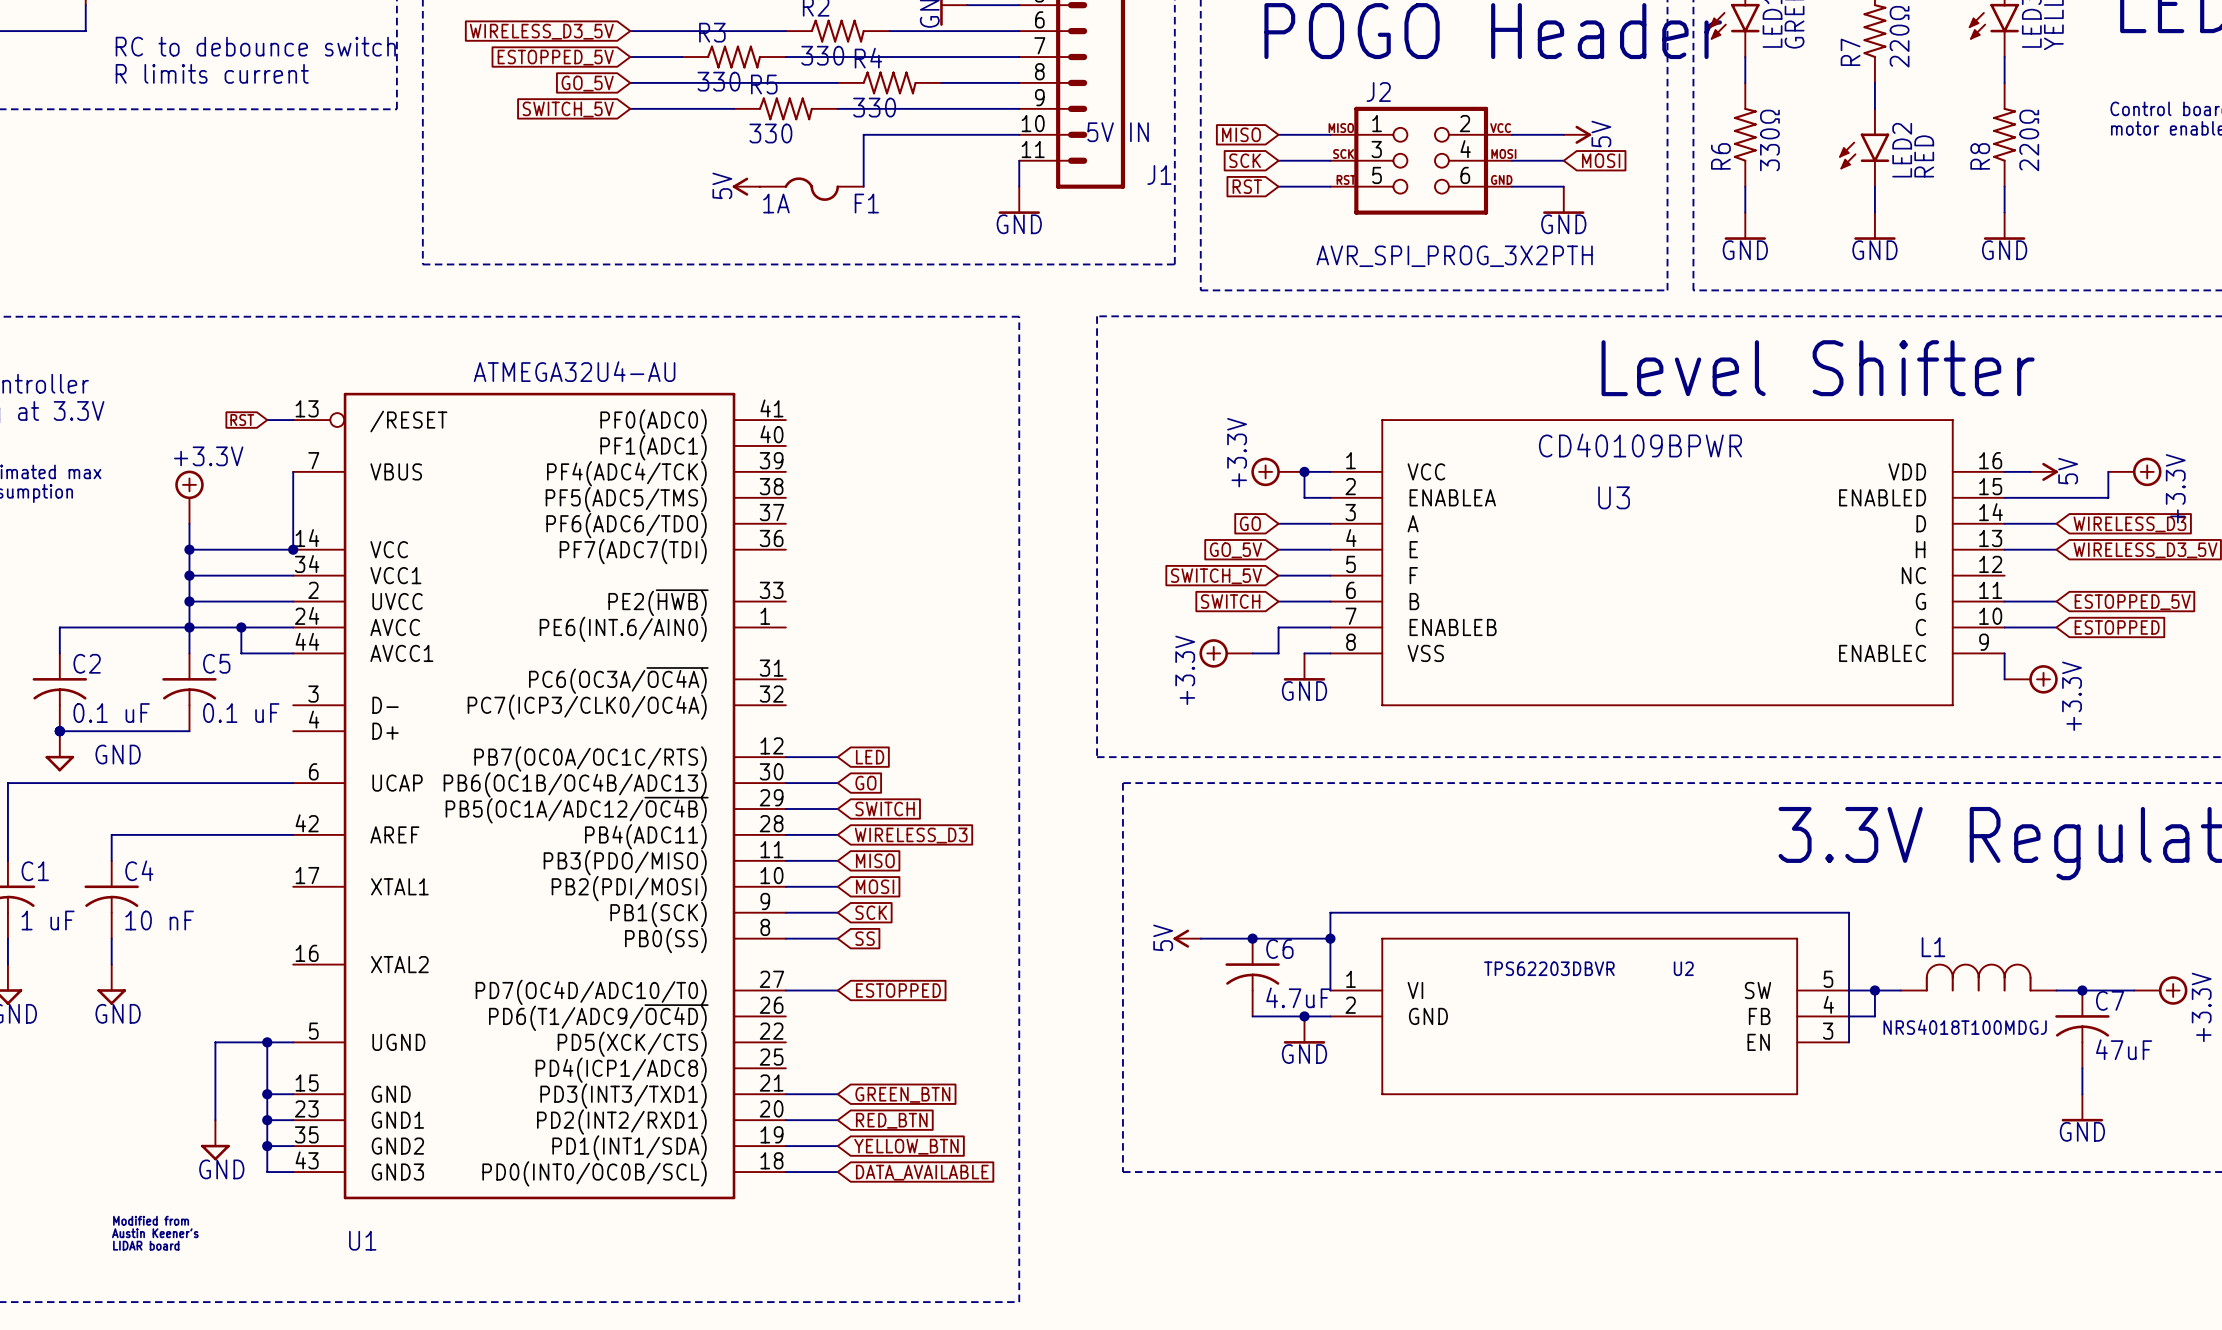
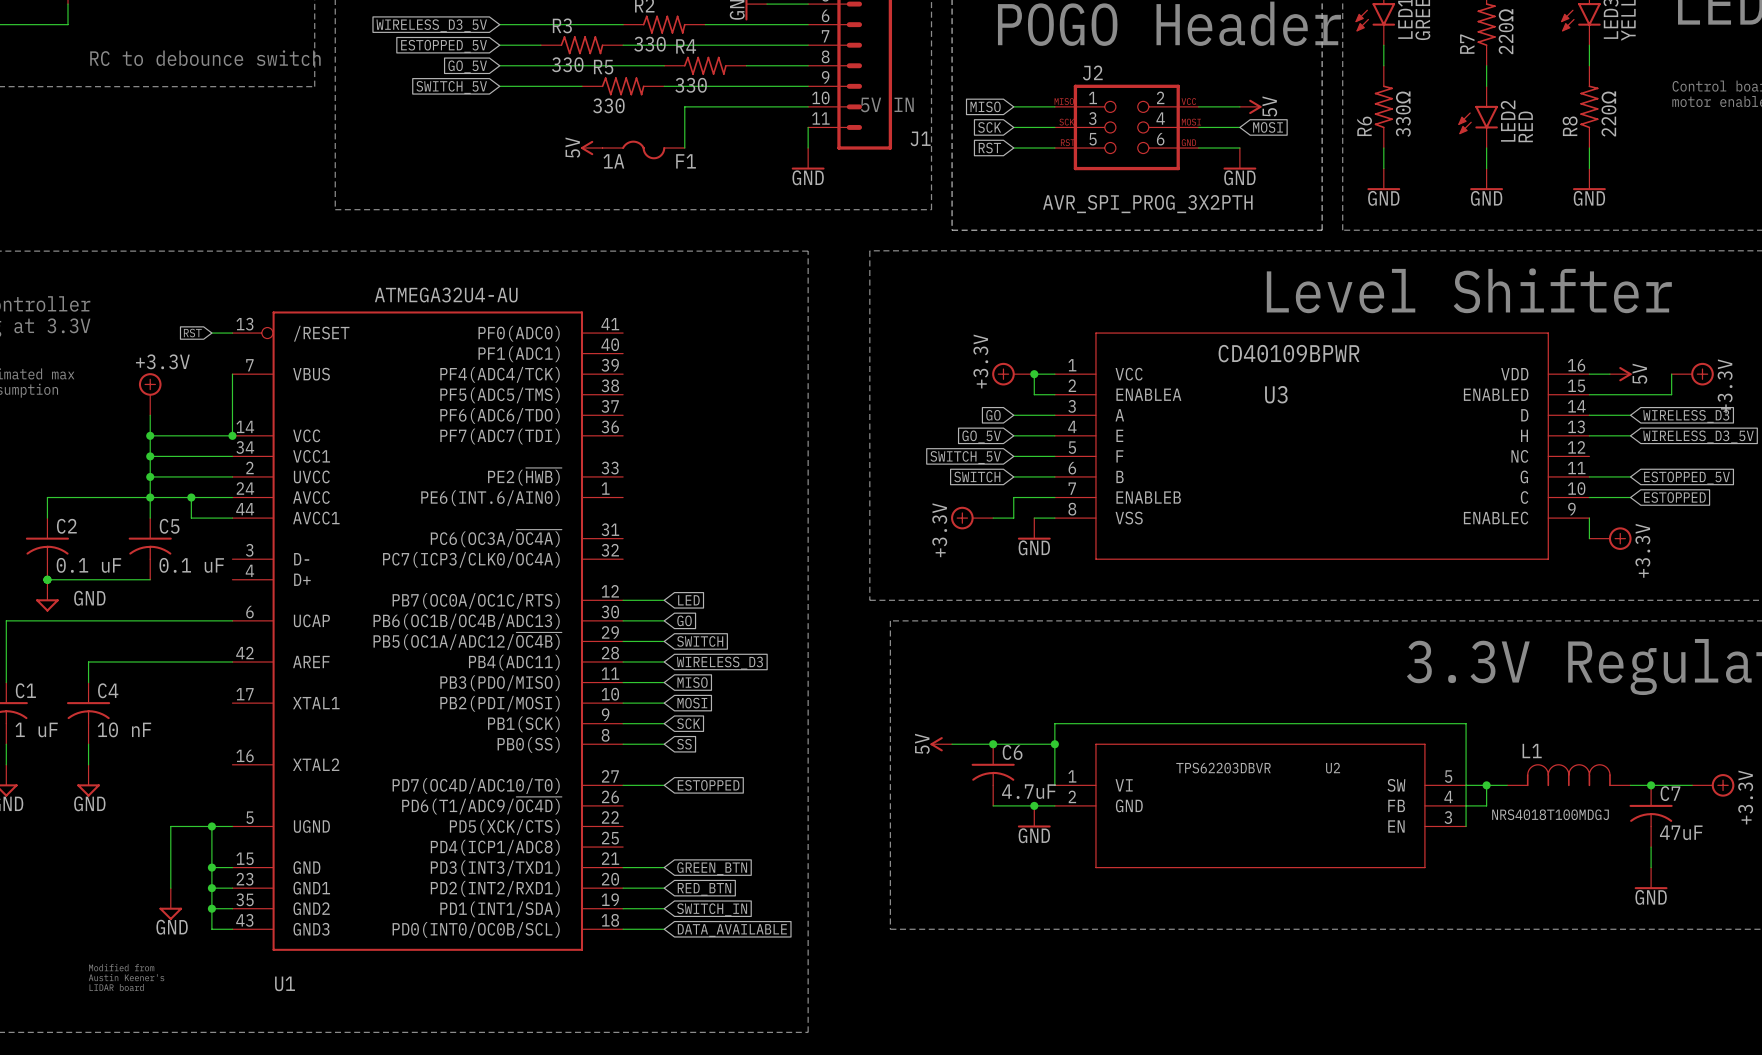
text: RC to debounce switch (255, 46) -> none
text: R limits current (212, 73) -> RC to debounce switch (205, 58)
global label: YELLOW_BTN (906, 1146) -> SWITCH_IN (712, 909)

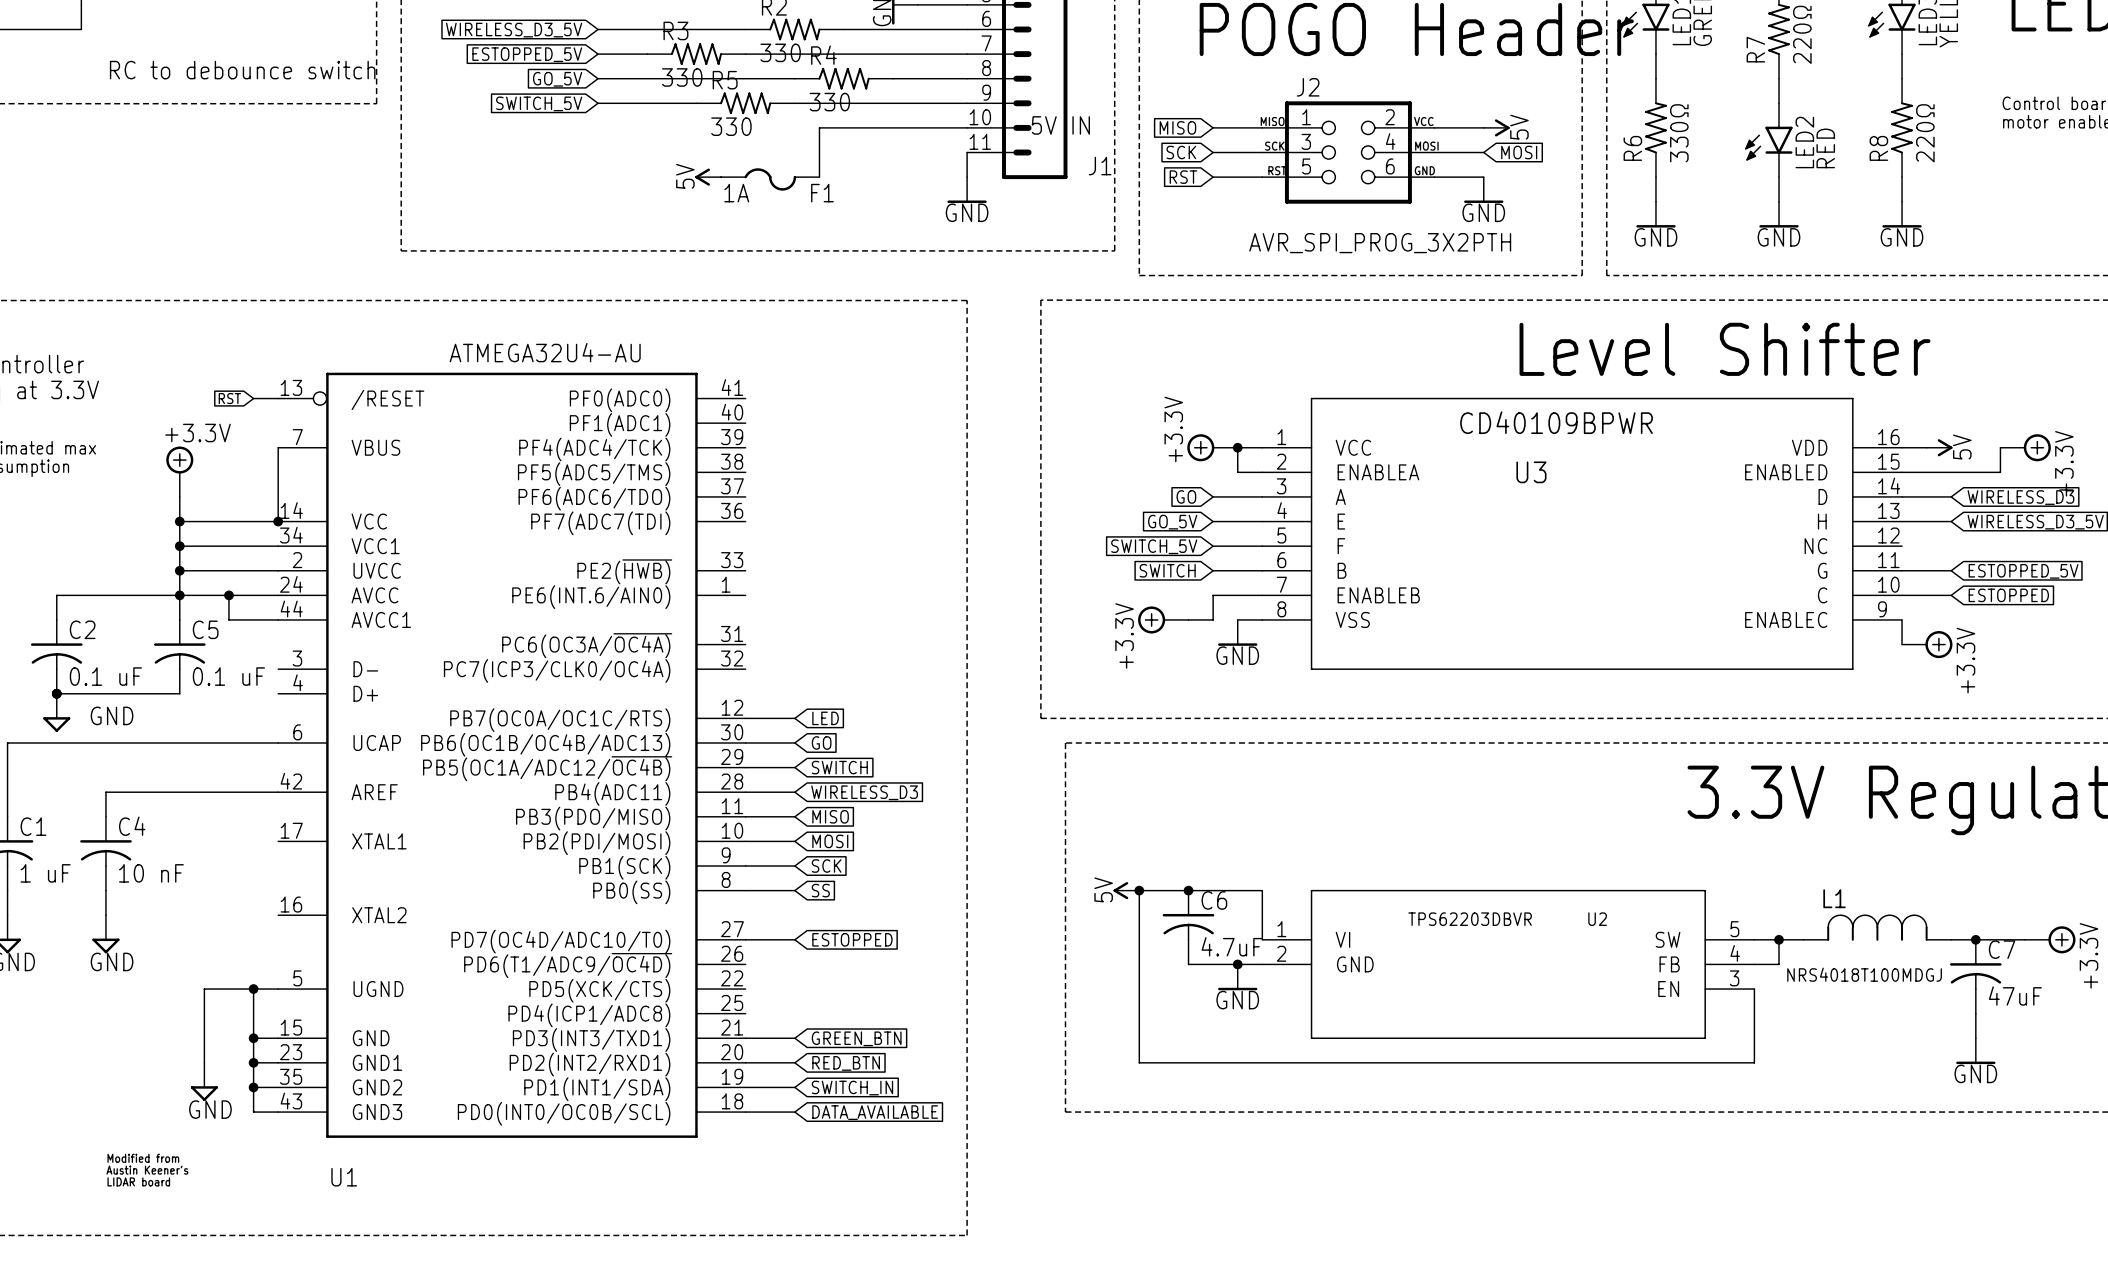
junction: none -> (1139, 890)
wire: (1054, 744) (1054, 723) (1466, 723) (1466, 826) -> (1139, 890) (1139, 1062) (1754, 1062) (1754, 989)
junction: (1054, 744) -> none

